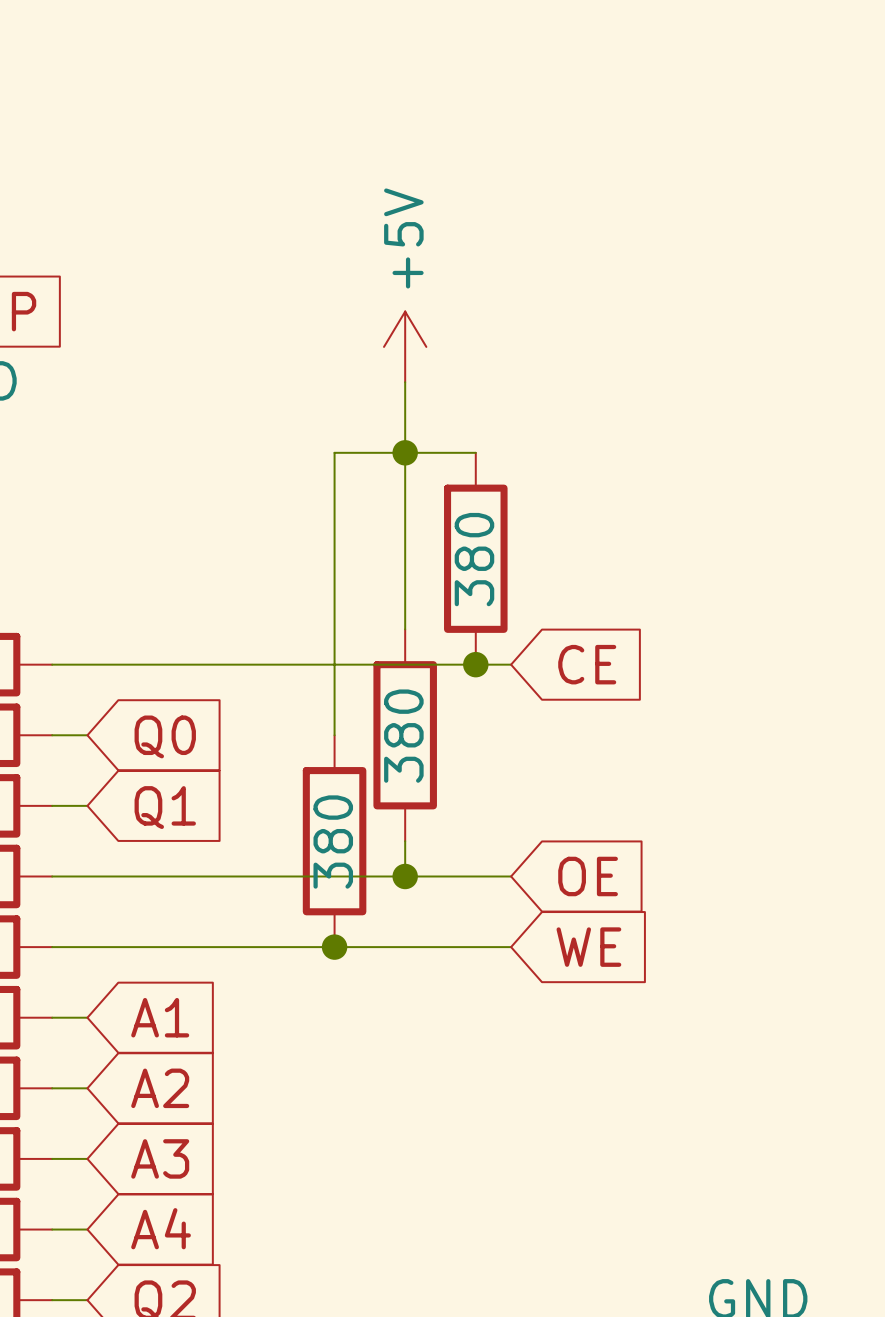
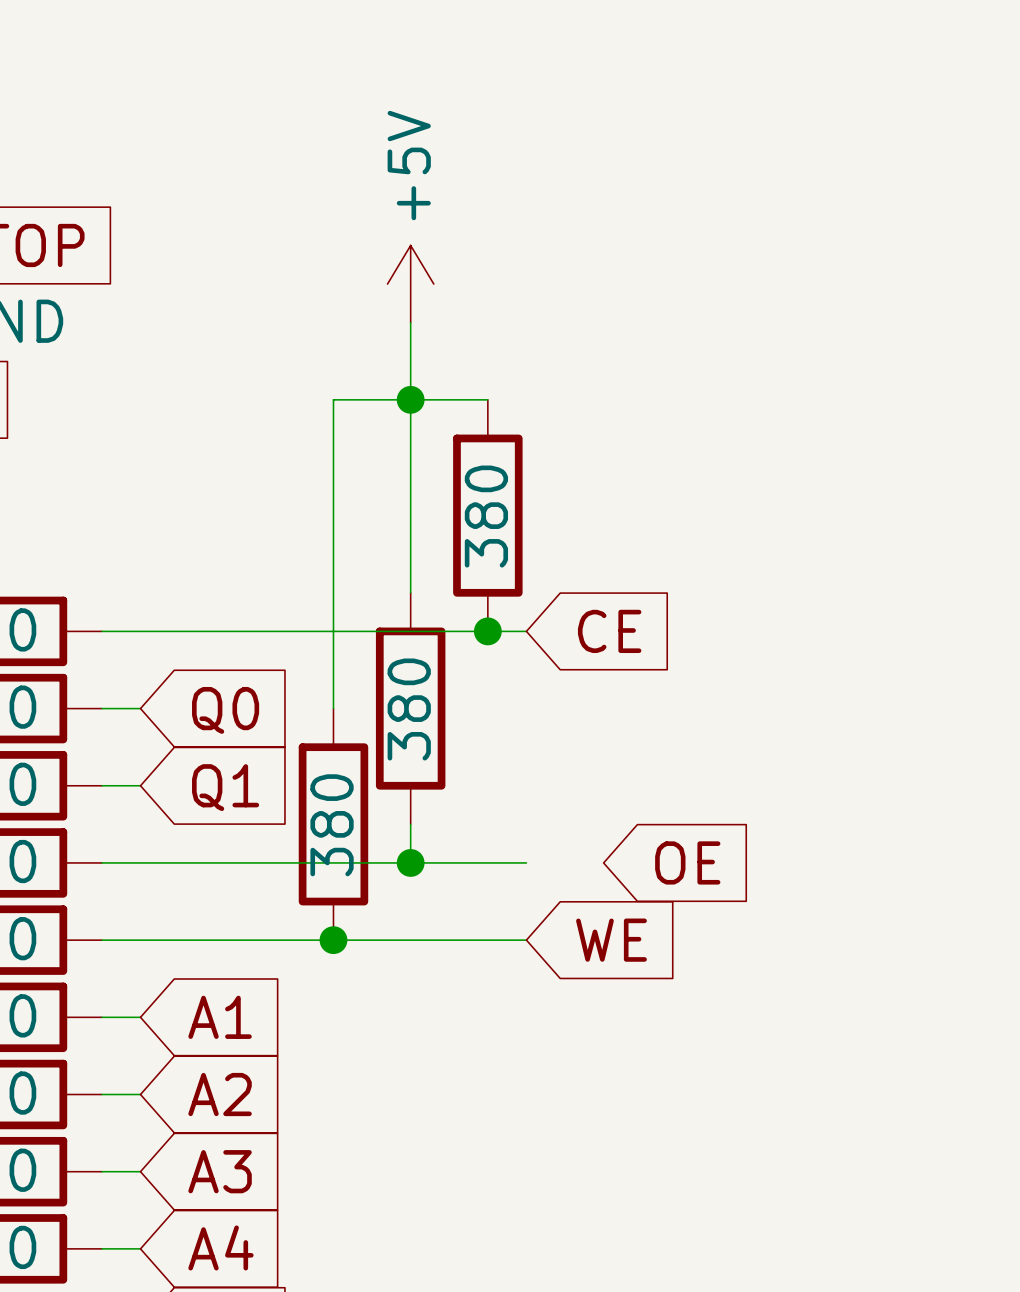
power symbol position: +5V (405, 346) -> +5V (410, 284)
wire: none -> (410, 322) (410, 399) (333, 399) (333, 708)
wire: (405, 382) (405, 629) -> none
wire: (405, 452) (475, 452) -> none
junction position: (405, 452) -> (410, 399)
part position: (475, 558) -> (487, 515)
wire: (334, 629) (334, 735) -> none
wire: (440, 664) (511, 664) -> none
junction position: (475, 664) -> (487, 631)
global label position: CE (587, 664) -> CE (609, 631)
part: none -> 380 (410, 708)
part: 380 (405, 735) -> none
part: none -> 380 (333, 824)
part: 380 (334, 841) -> none
wire: (405, 841) (405, 876) -> (410, 824) (410, 862)
junction: none -> (410, 862)
junction: (405, 876) -> none
wire: (440, 876) (511, 876) -> none
junction: none -> (333, 940)
junction: (334, 947) -> none
wire: (440, 947) (511, 947) -> none
global label position: WE (588, 947) -> WE (611, 940)

